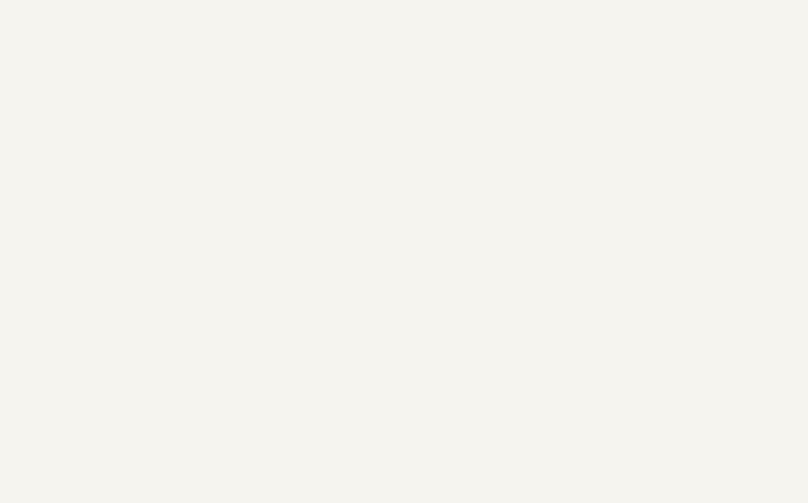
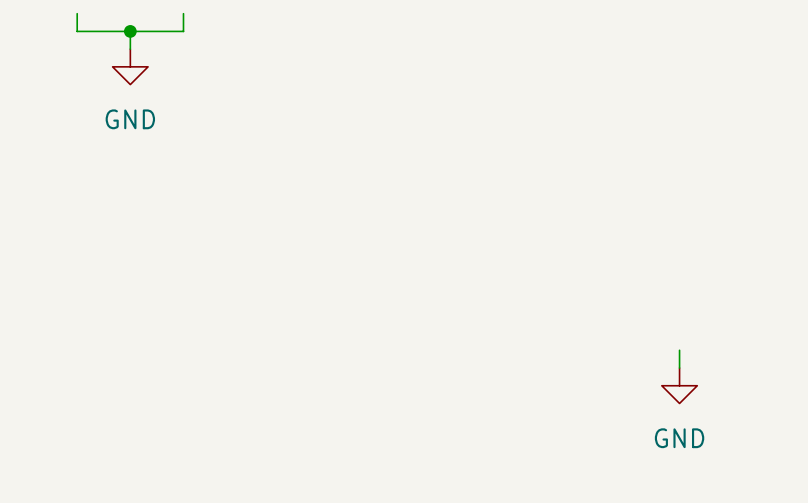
wire: none -> (77, 13) (77, 31) (183, 31) (183, 13)
wire: none -> (130, 31) (130, 49)
junction: none -> (130, 31)
power symbol: none -> GND (130, 66)
wire: none -> (679, 350) (679, 368)
power symbol: none -> GND (679, 385)

